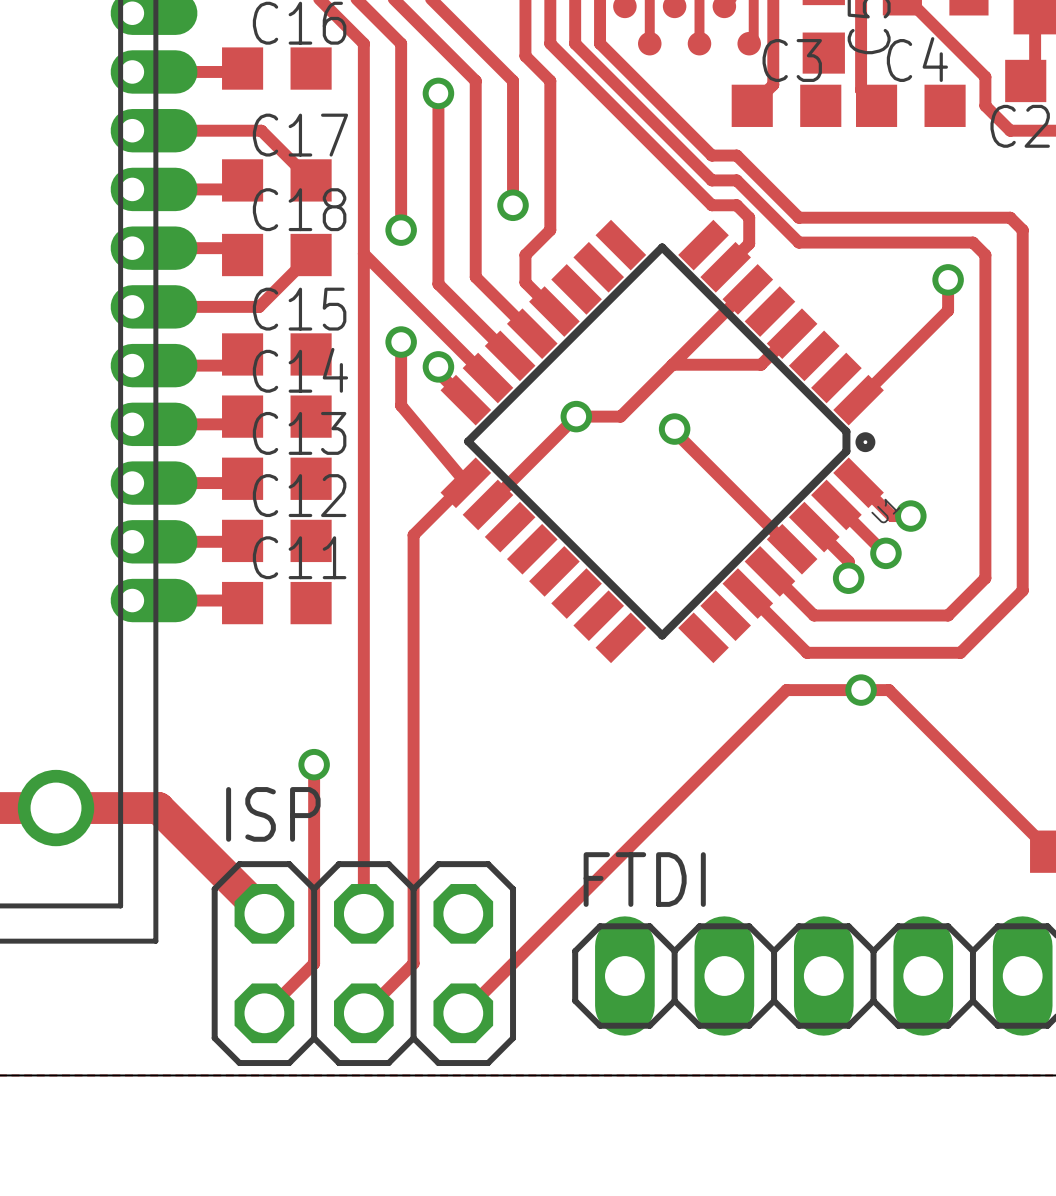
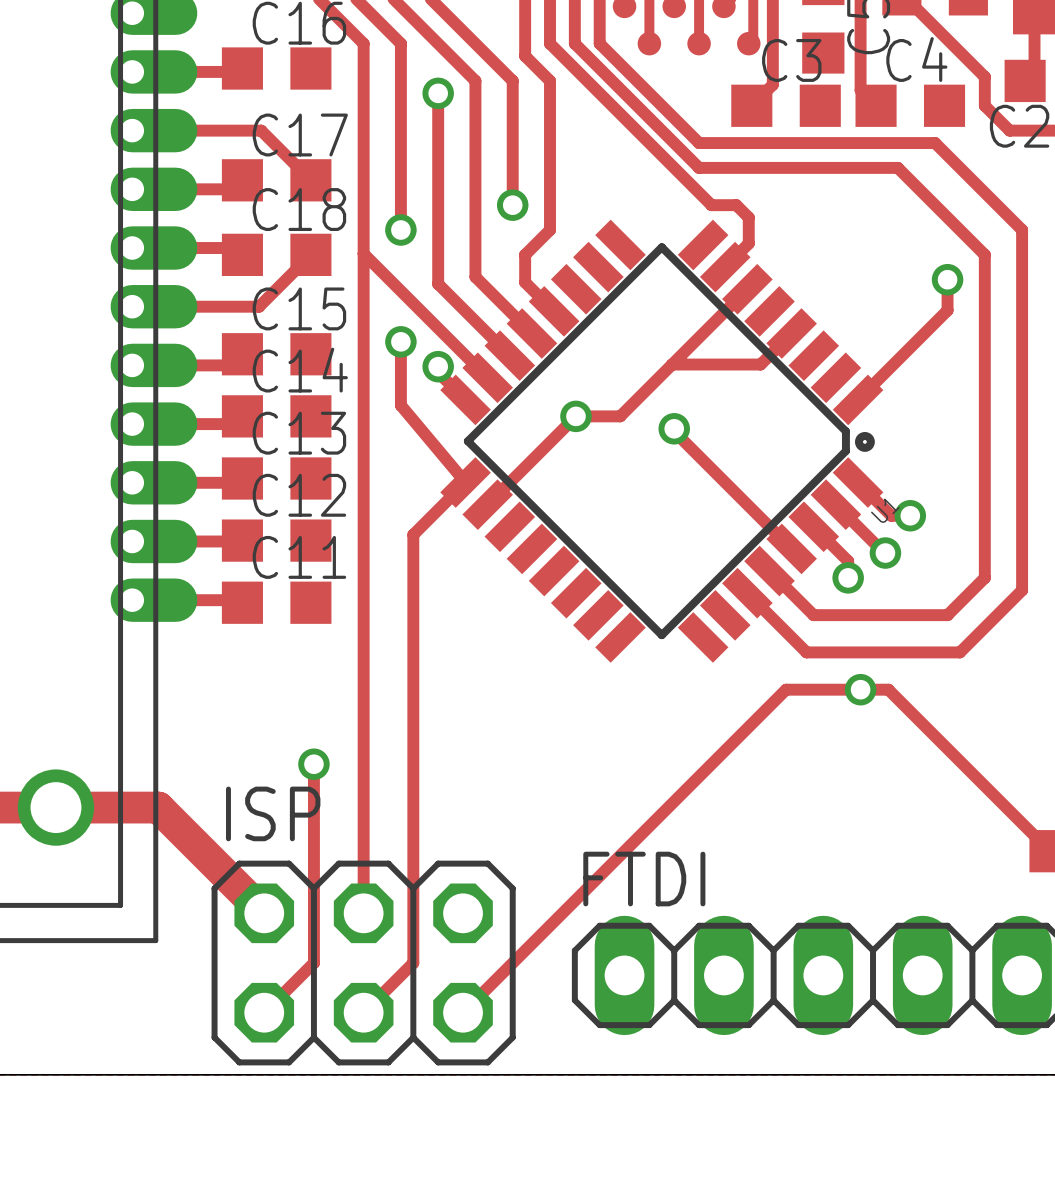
track: (699, 143) (711, 155) (736, 155) (798, 217) (1010, 217) -> (699, 143) (935, 143) (1009, 217)
track: (699, 167) (711, 180) (736, 180) (798, 242) (972, 242) -> (699, 167) (897, 167) (972, 242)

